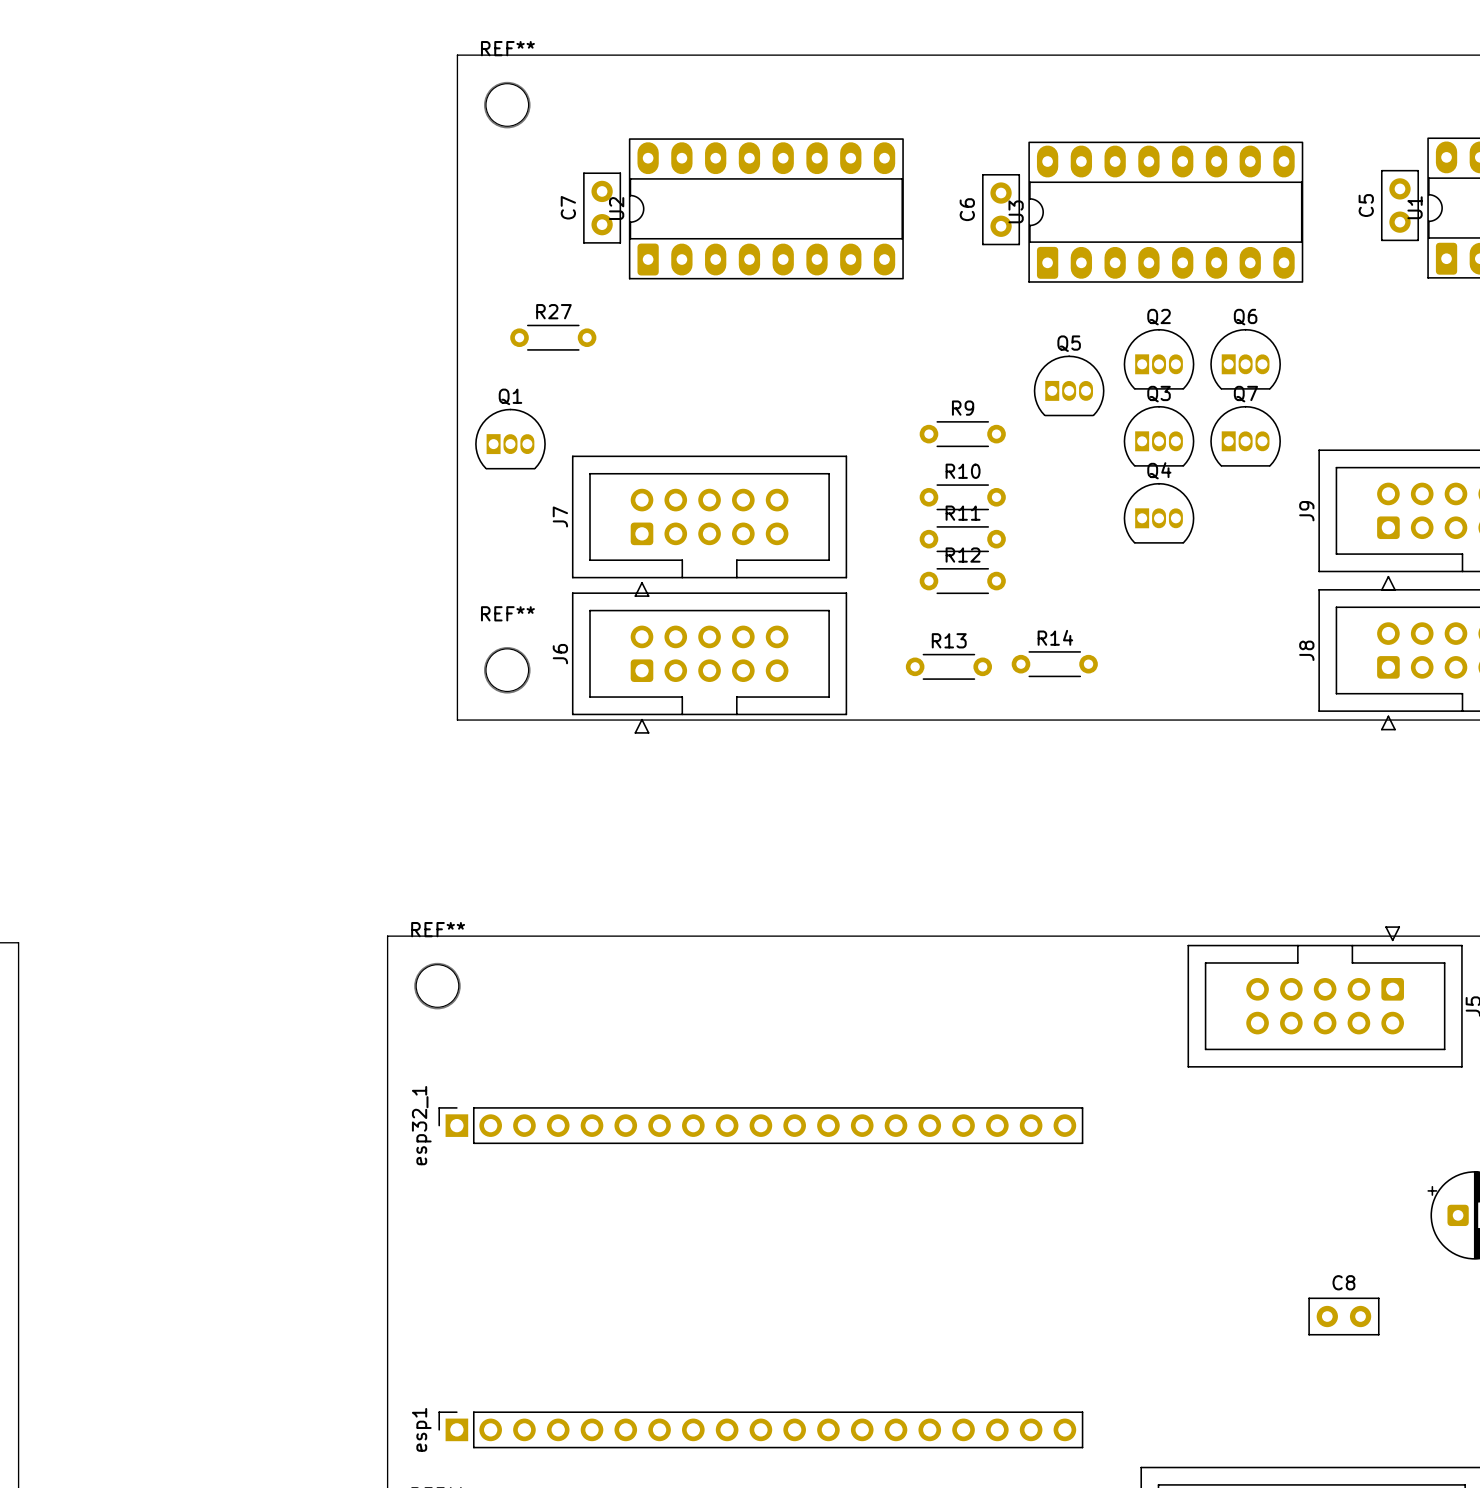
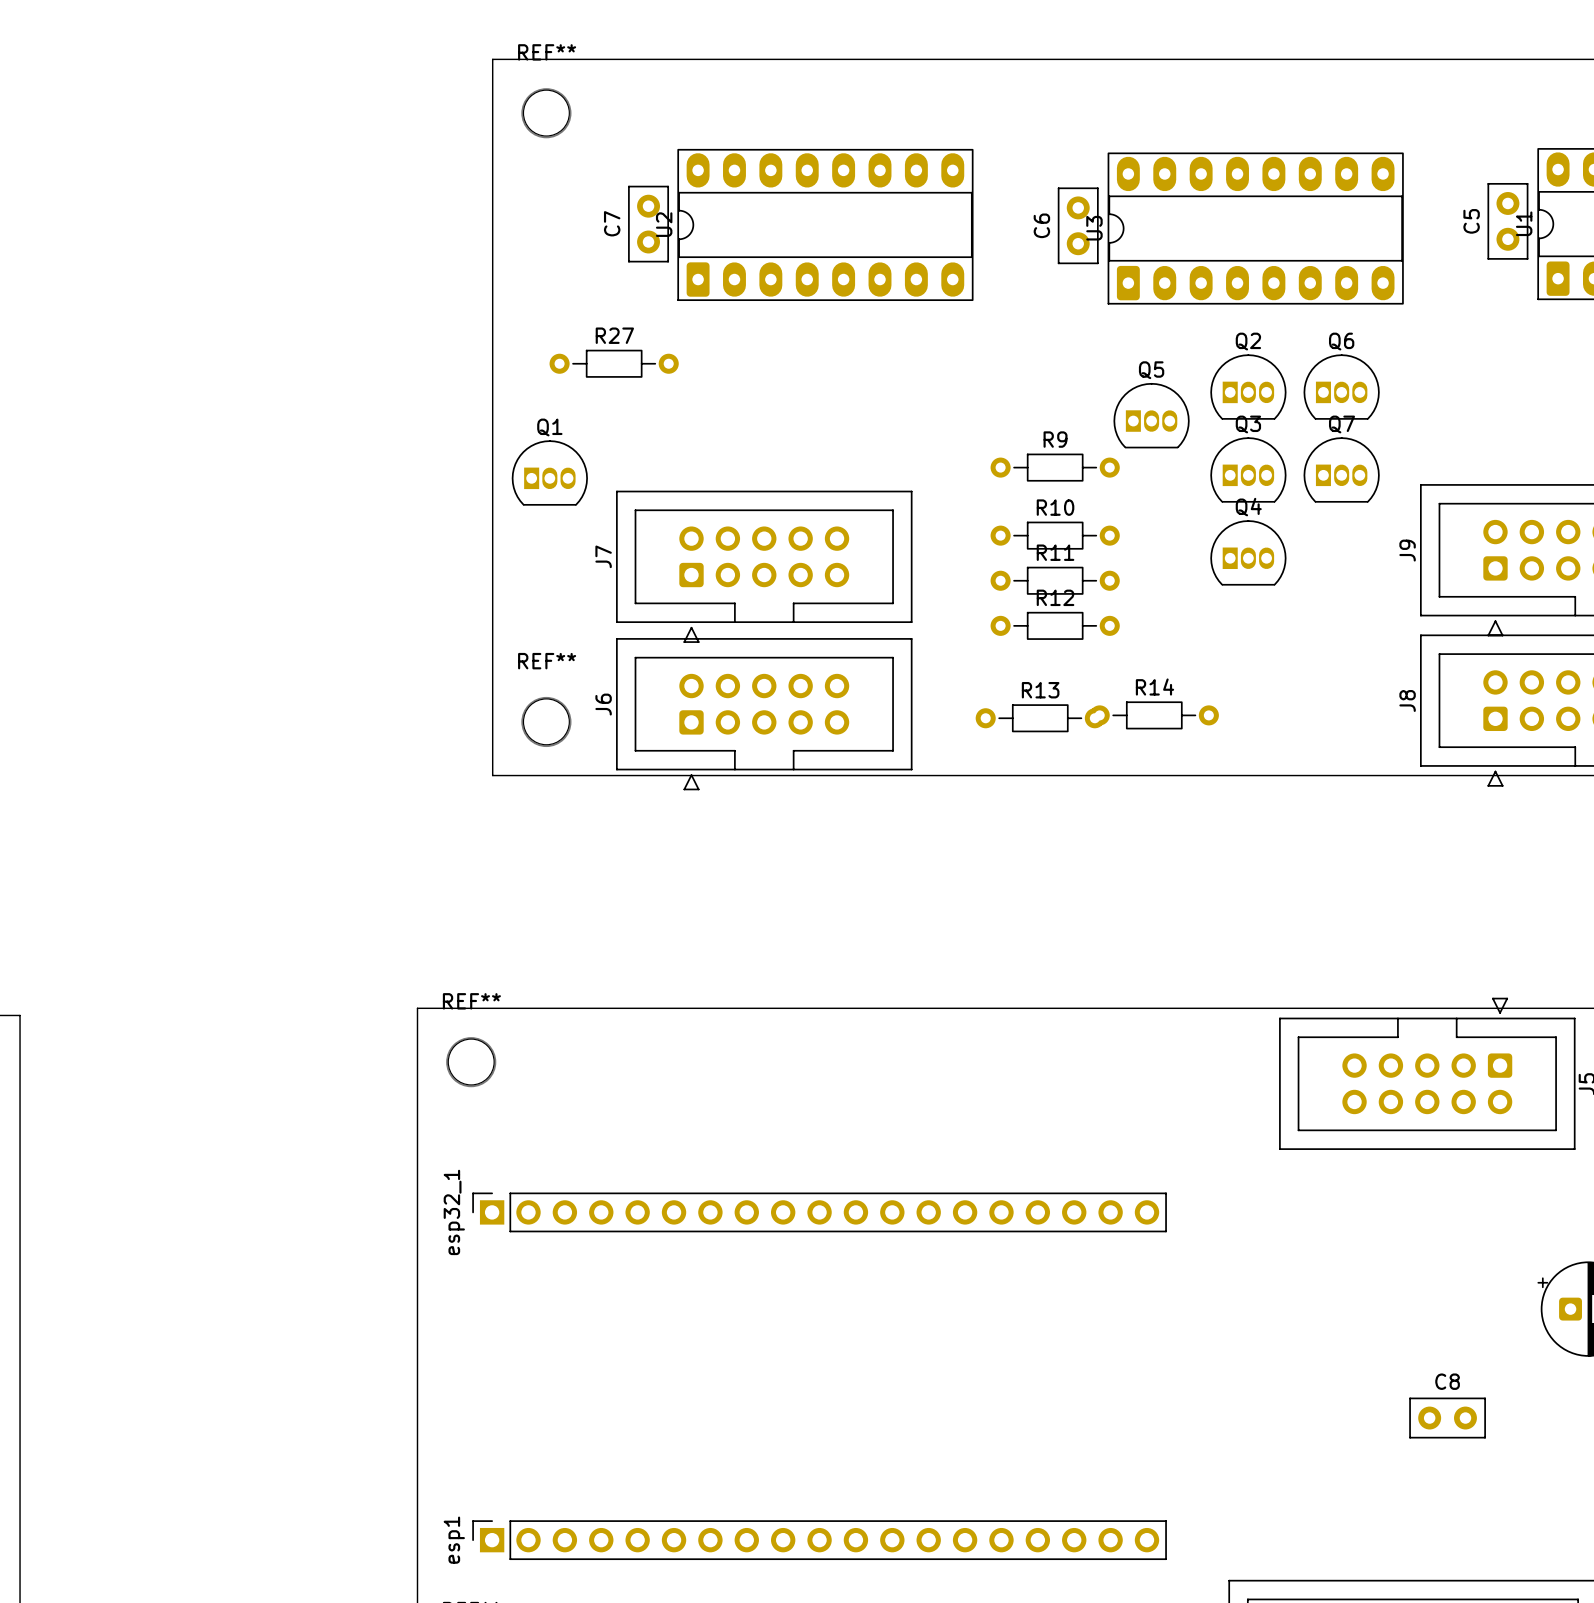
R27 footprint: [510, 324, 597, 351] -> [549, 349, 679, 378]
R9 footprint: [919, 421, 1006, 448] -> [990, 453, 1120, 482]
R10 footprint: [919, 484, 1006, 511] -> [990, 521, 1120, 550]
R11 footprint: [919, 526, 1006, 553] -> [990, 566, 1120, 595]
R12 footprint: [919, 568, 1006, 595] -> [990, 611, 1120, 640]
R14 footprint: [1011, 651, 1098, 678] -> [1089, 701, 1219, 730]
R13 footprint: [905, 653, 993, 680] -> [975, 704, 1105, 733]

